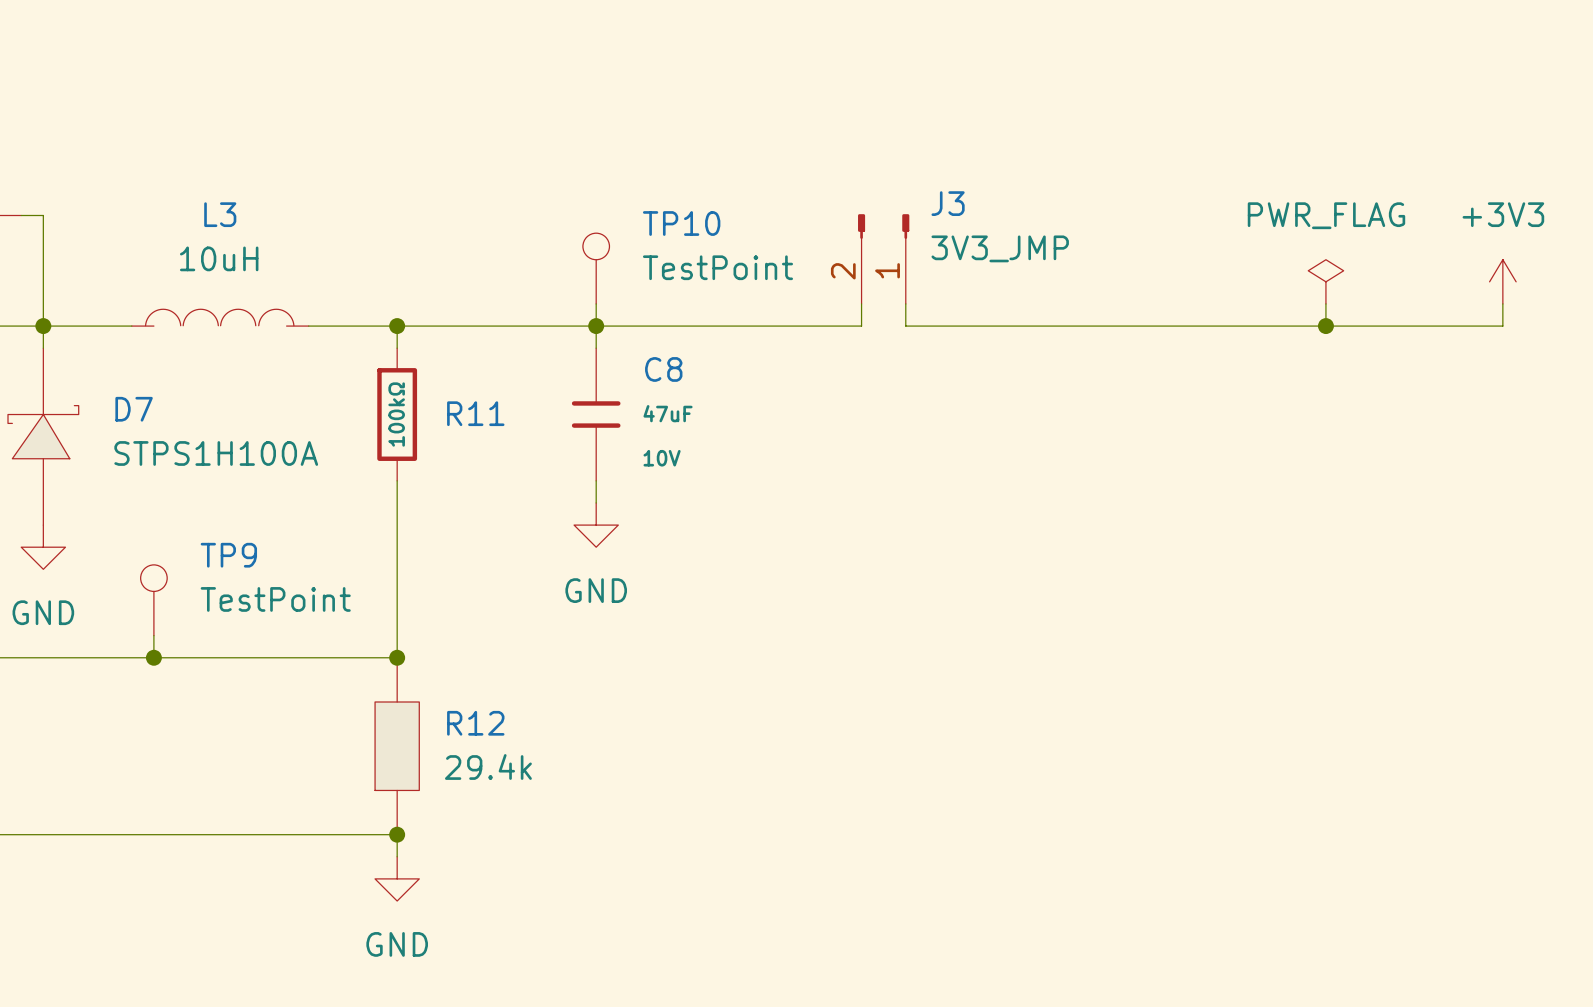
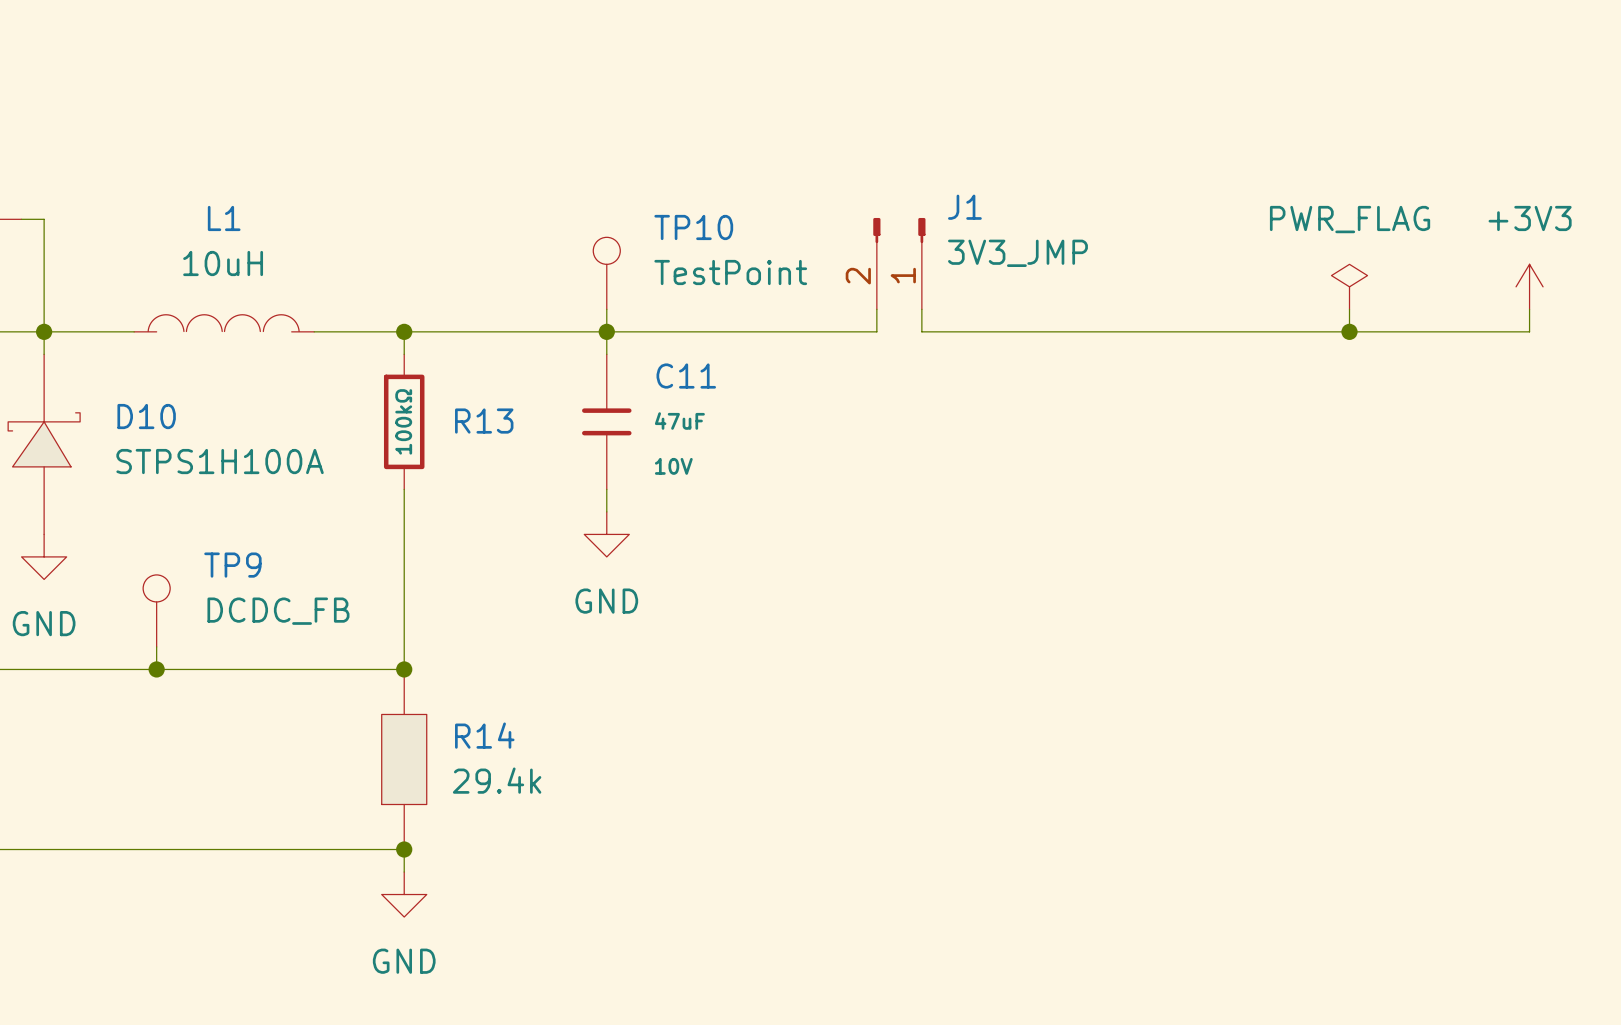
J3 name: J3 (948, 203) -> J1 (964, 207)
L3 name: L3 (220, 214) -> L1 (224, 218)
C8 name: C8 (663, 369) -> C11 (686, 376)
D7 name: D7 (134, 409) -> D10 (146, 416)
R11 name: R11 (475, 413) -> R13 (484, 421)
TP9 value: TestPoint (275, 599) -> DCDC_FB (278, 611)
R12 name: R12 (475, 723) -> R14 (484, 735)

